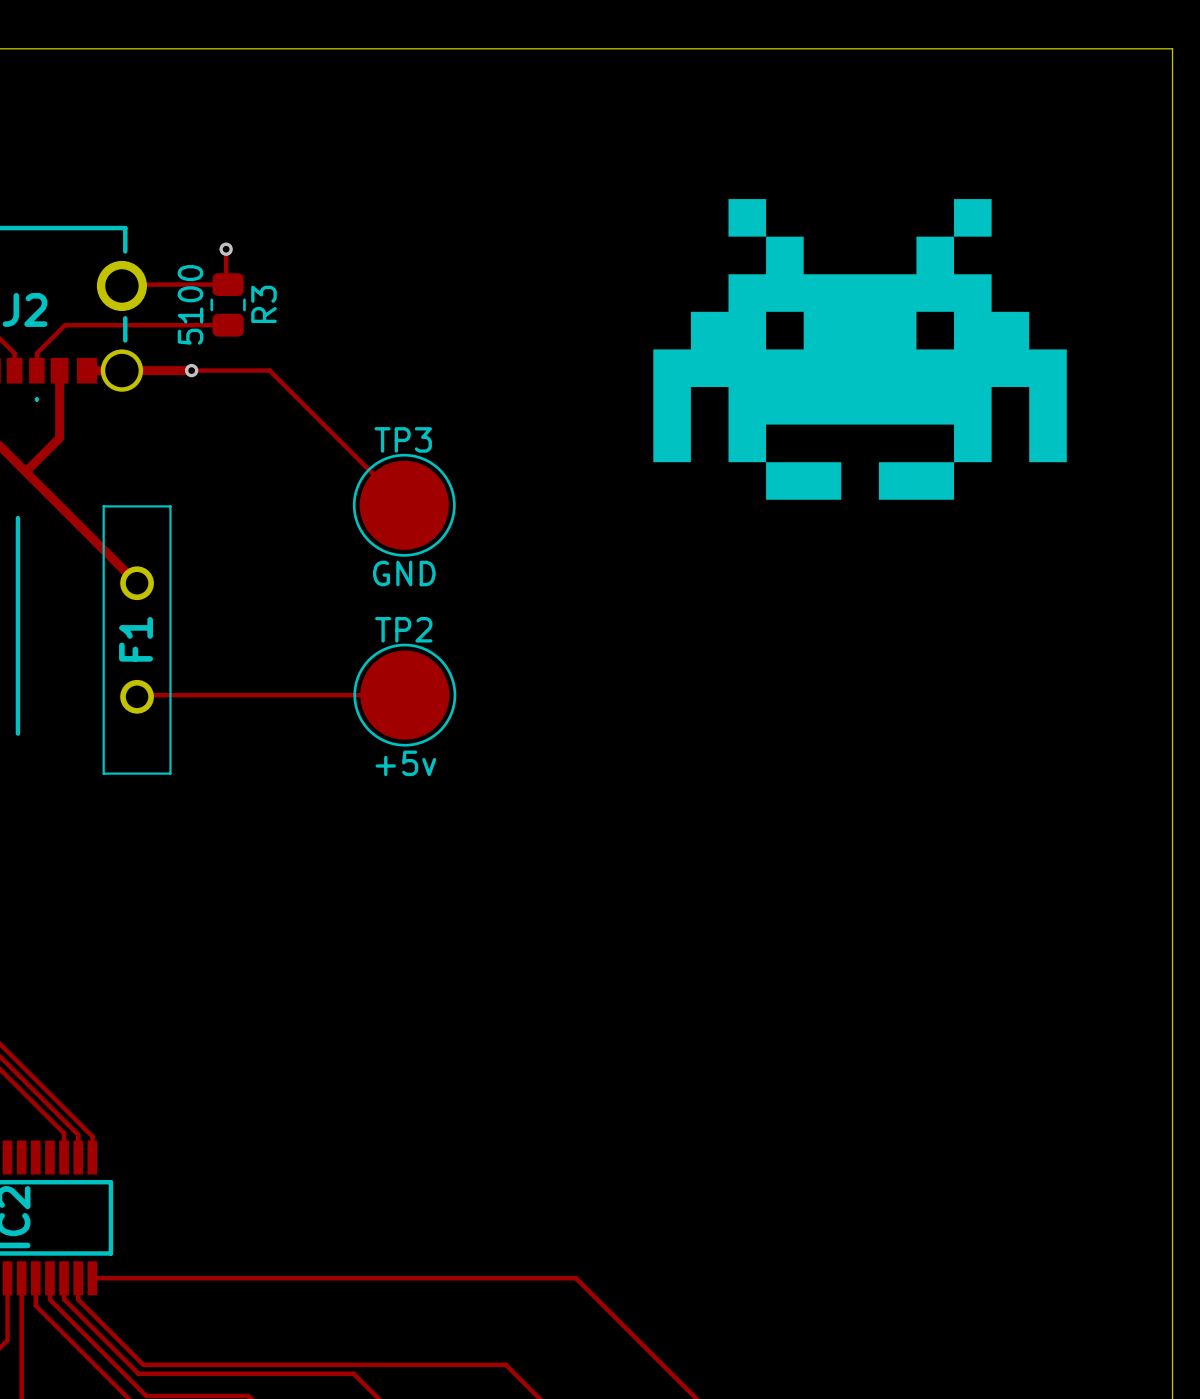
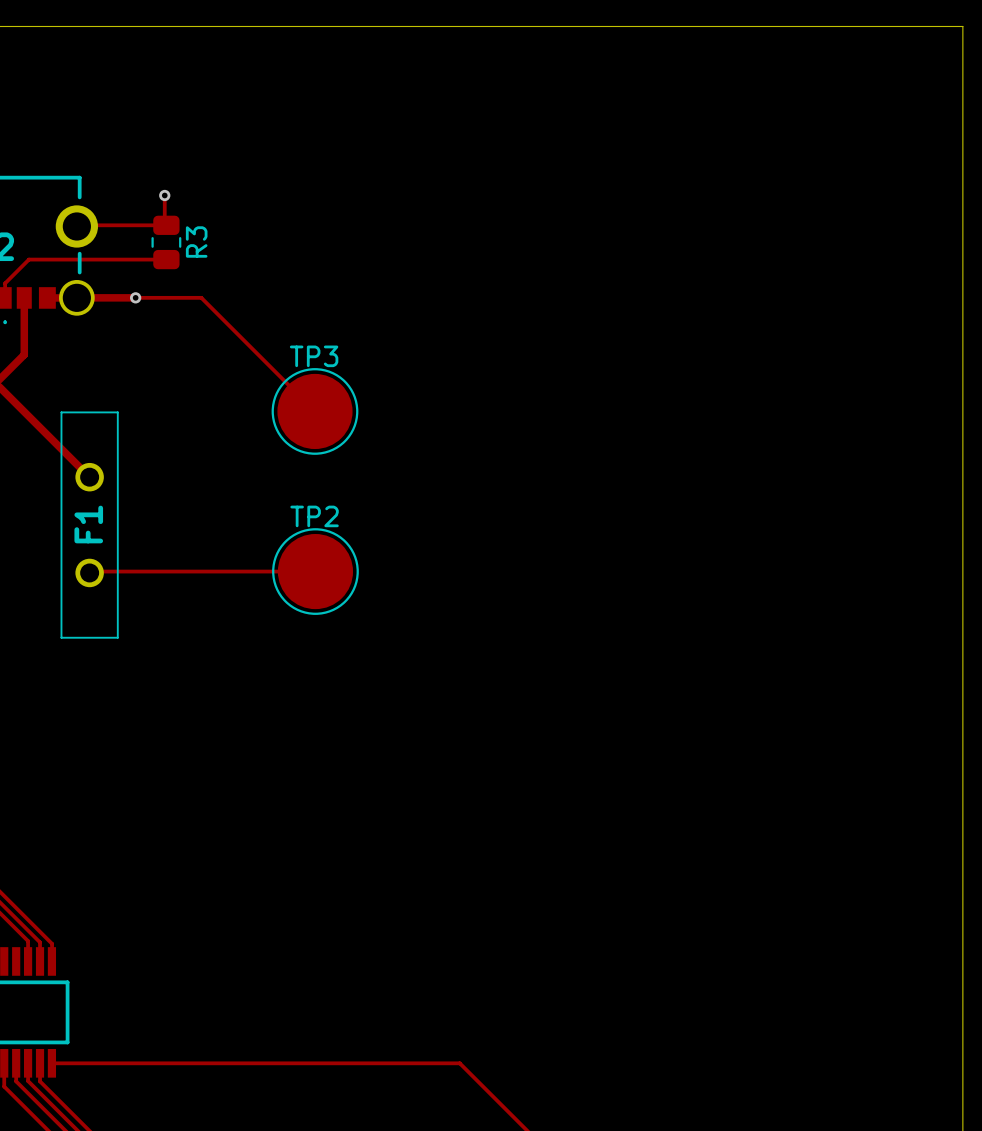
drawing: [653, 199, 1067, 500] -> none
R3 value: 5100 (190, 304) -> none
TP3 value: GND (404, 573) -> none
TP2 value: +5v (405, 763) -> none

